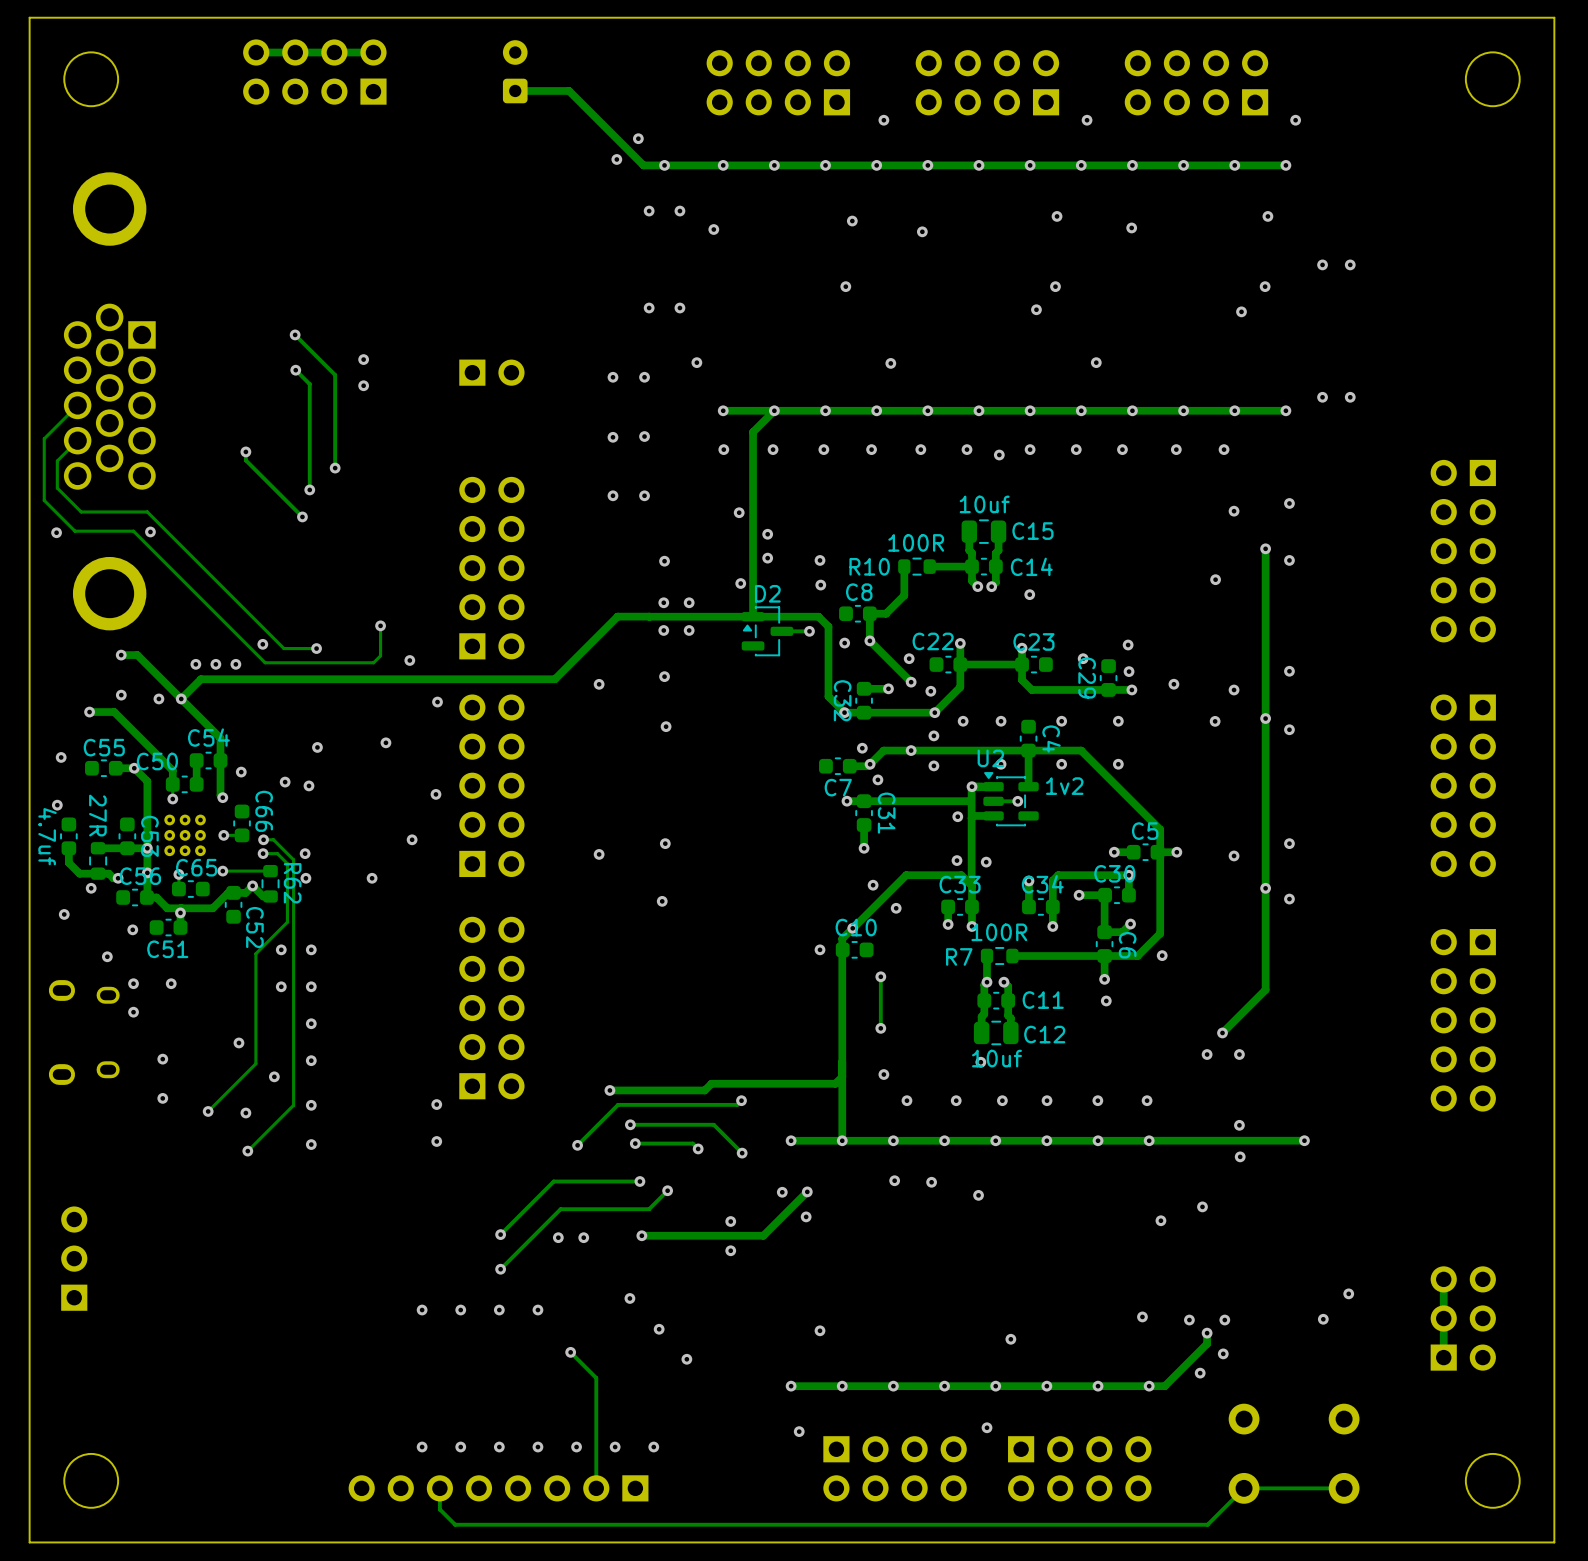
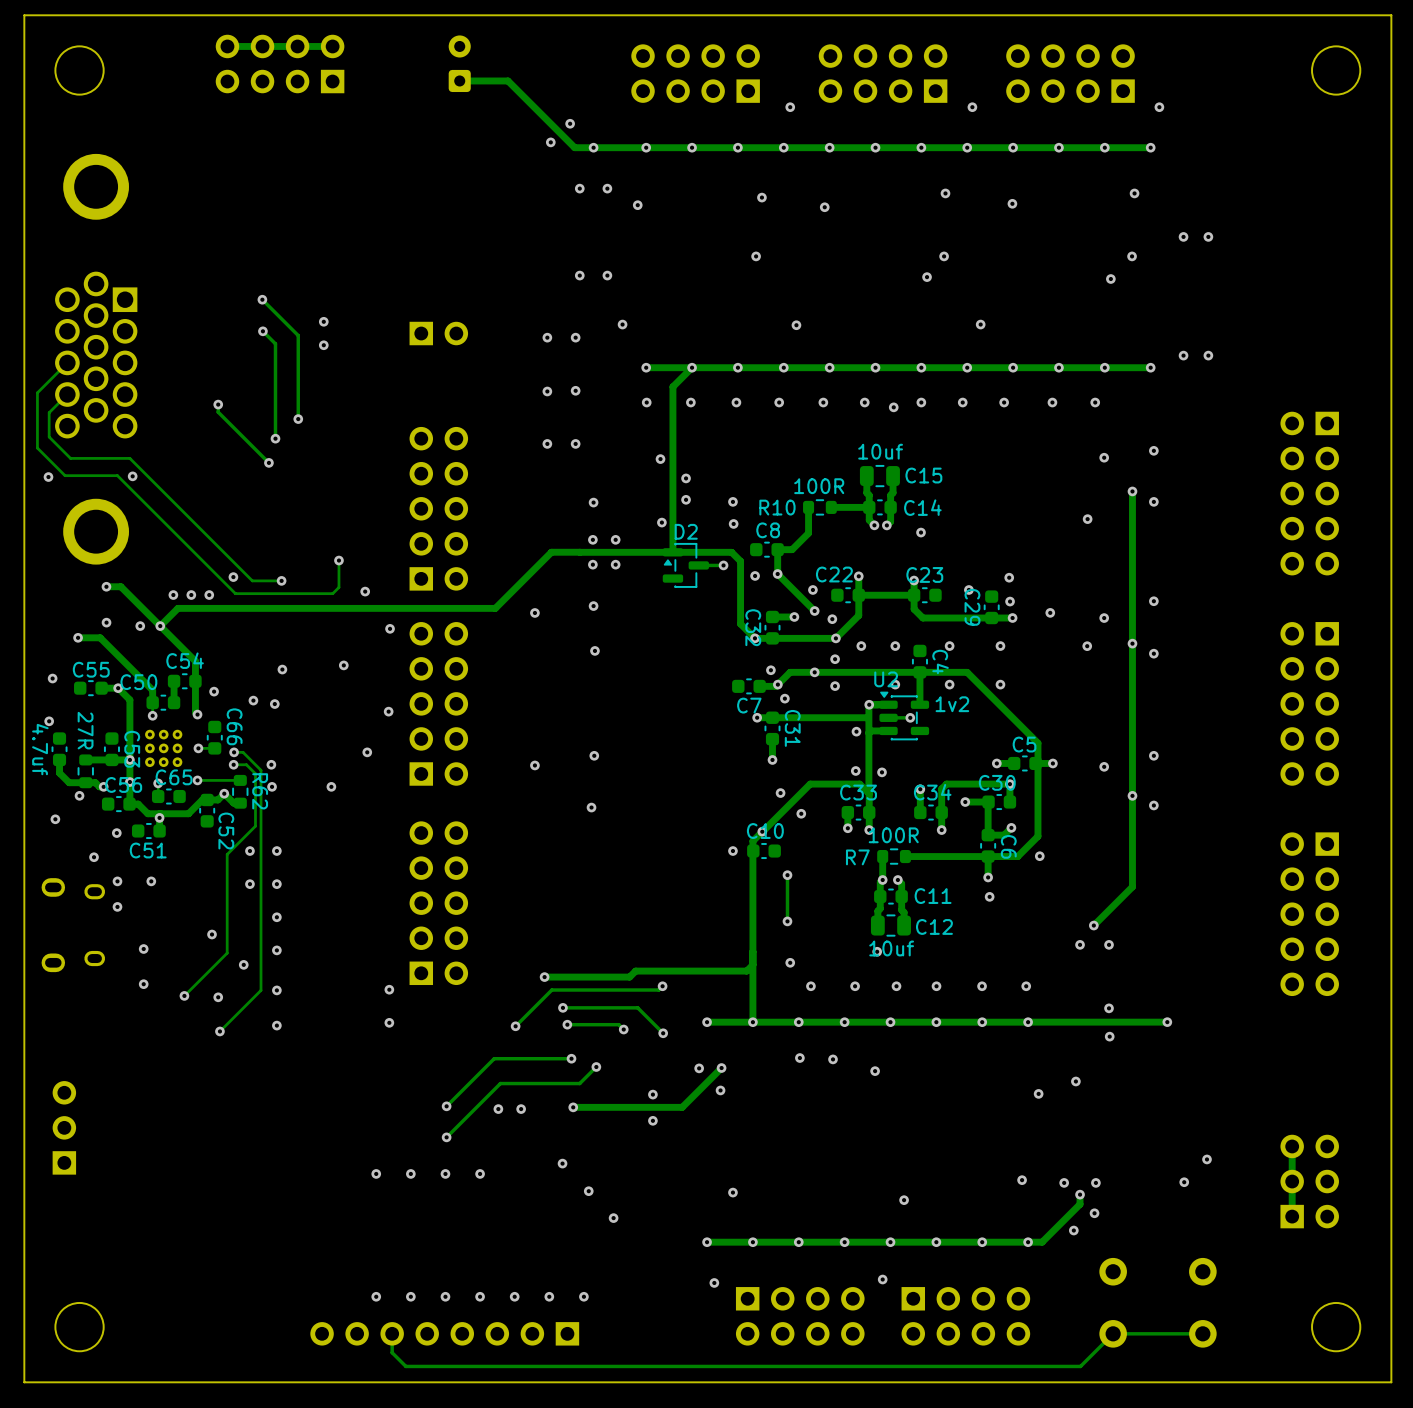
track: (570, 1352) (596, 1377) (596, 1488) -> none
via: (570, 1352) -> none

